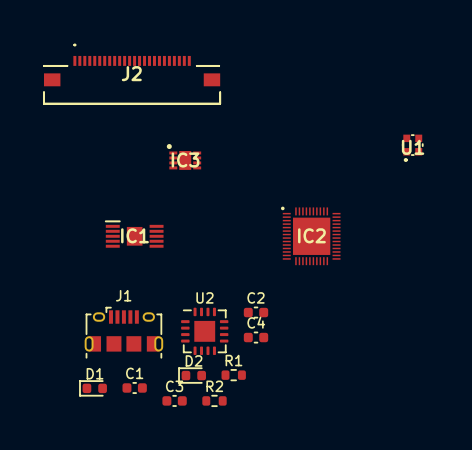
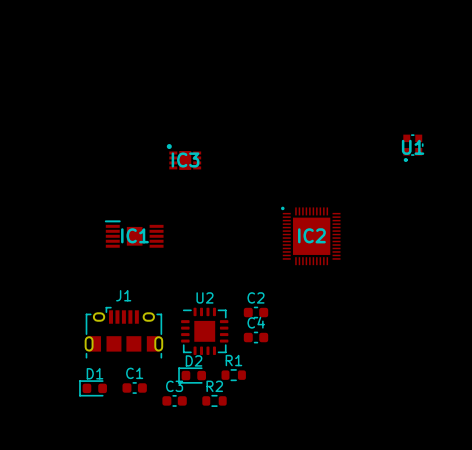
J2: (132, 73) -> none

